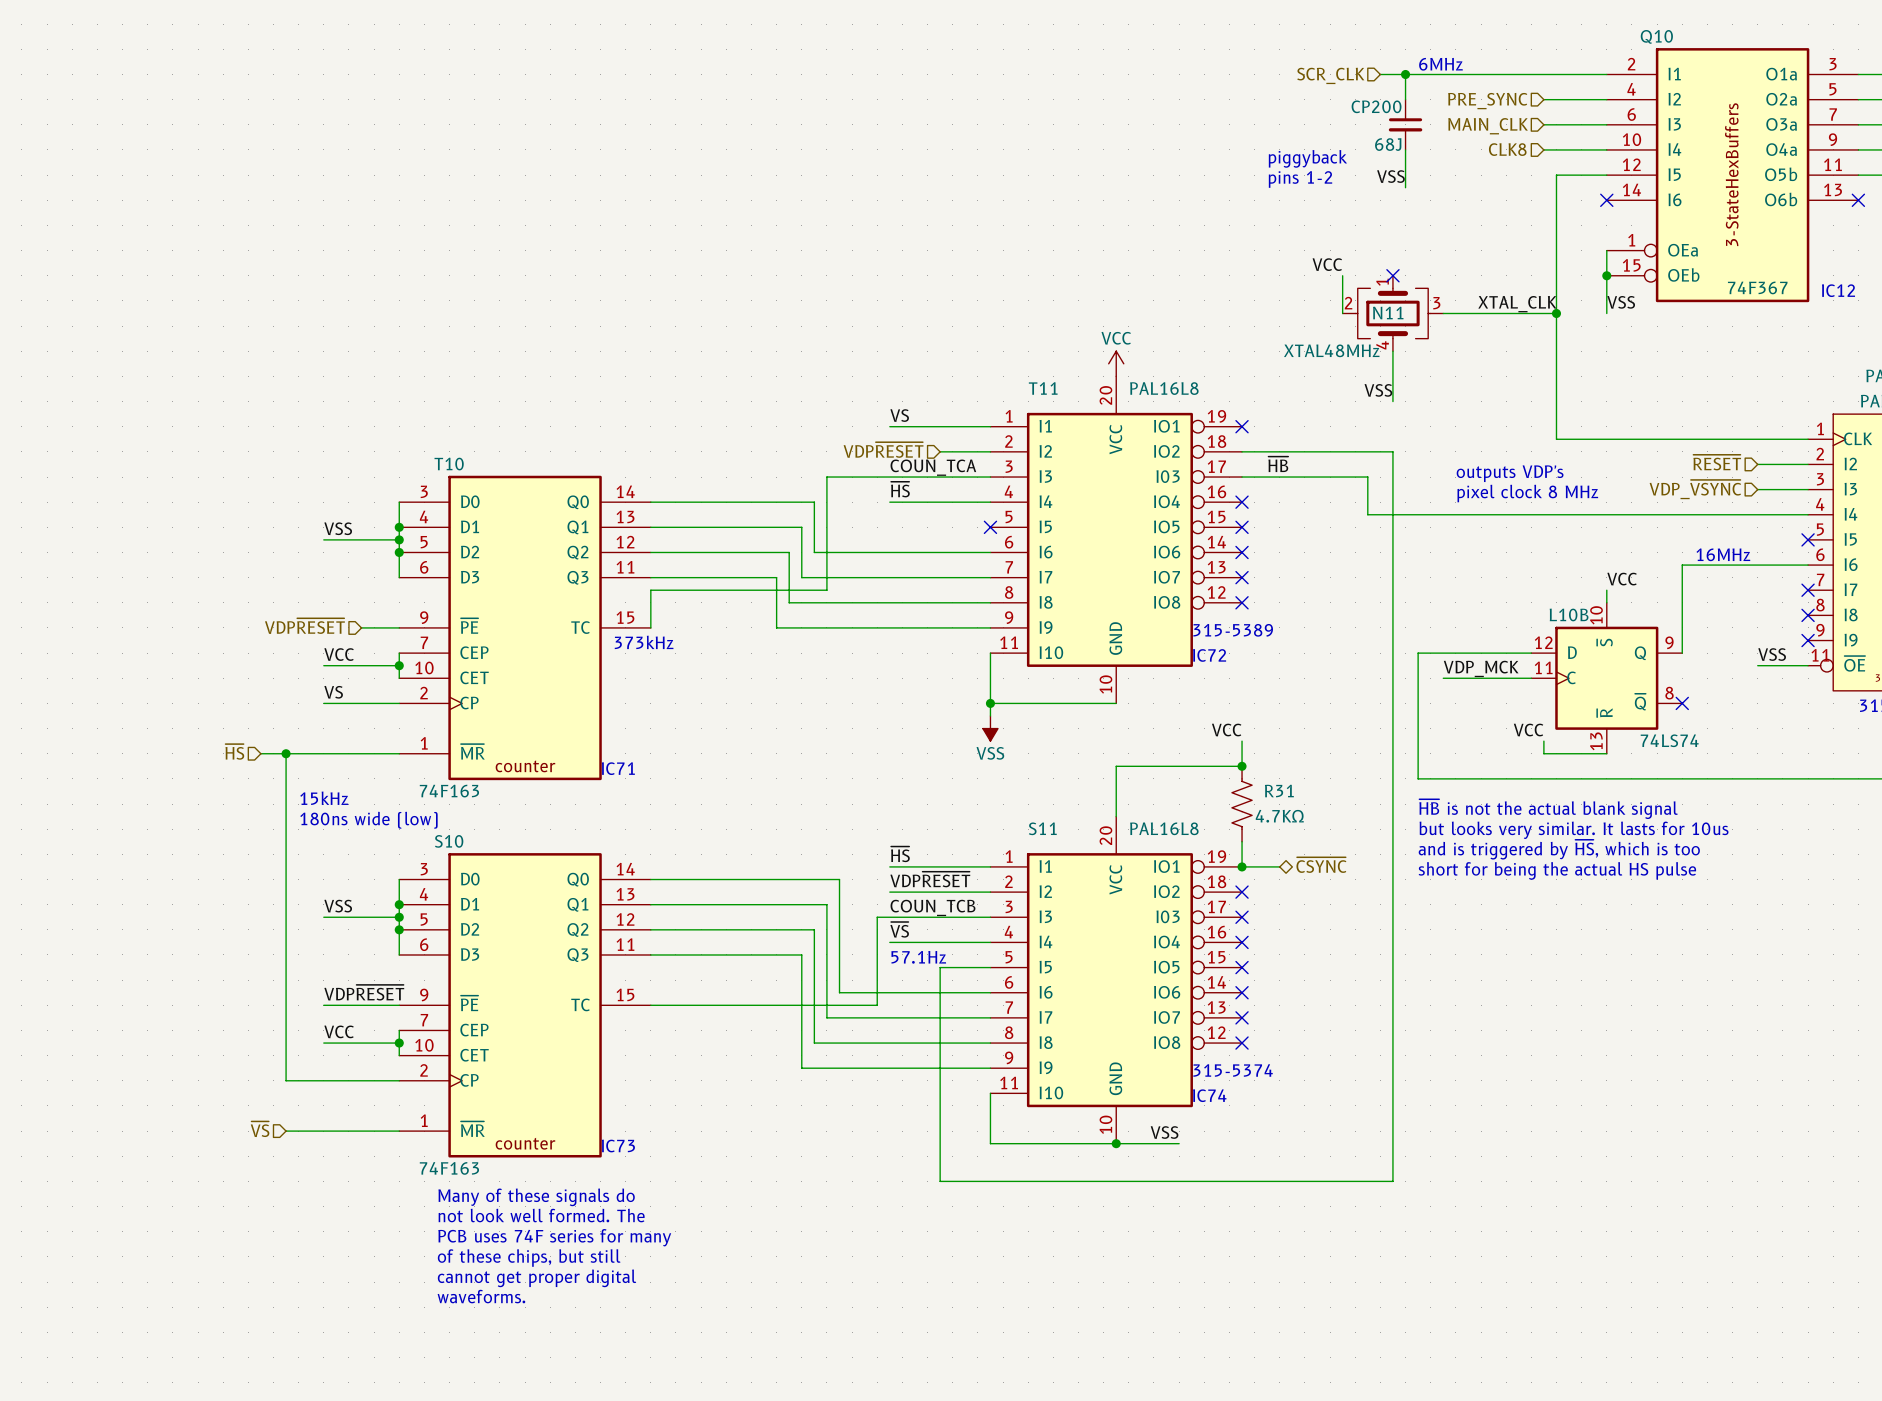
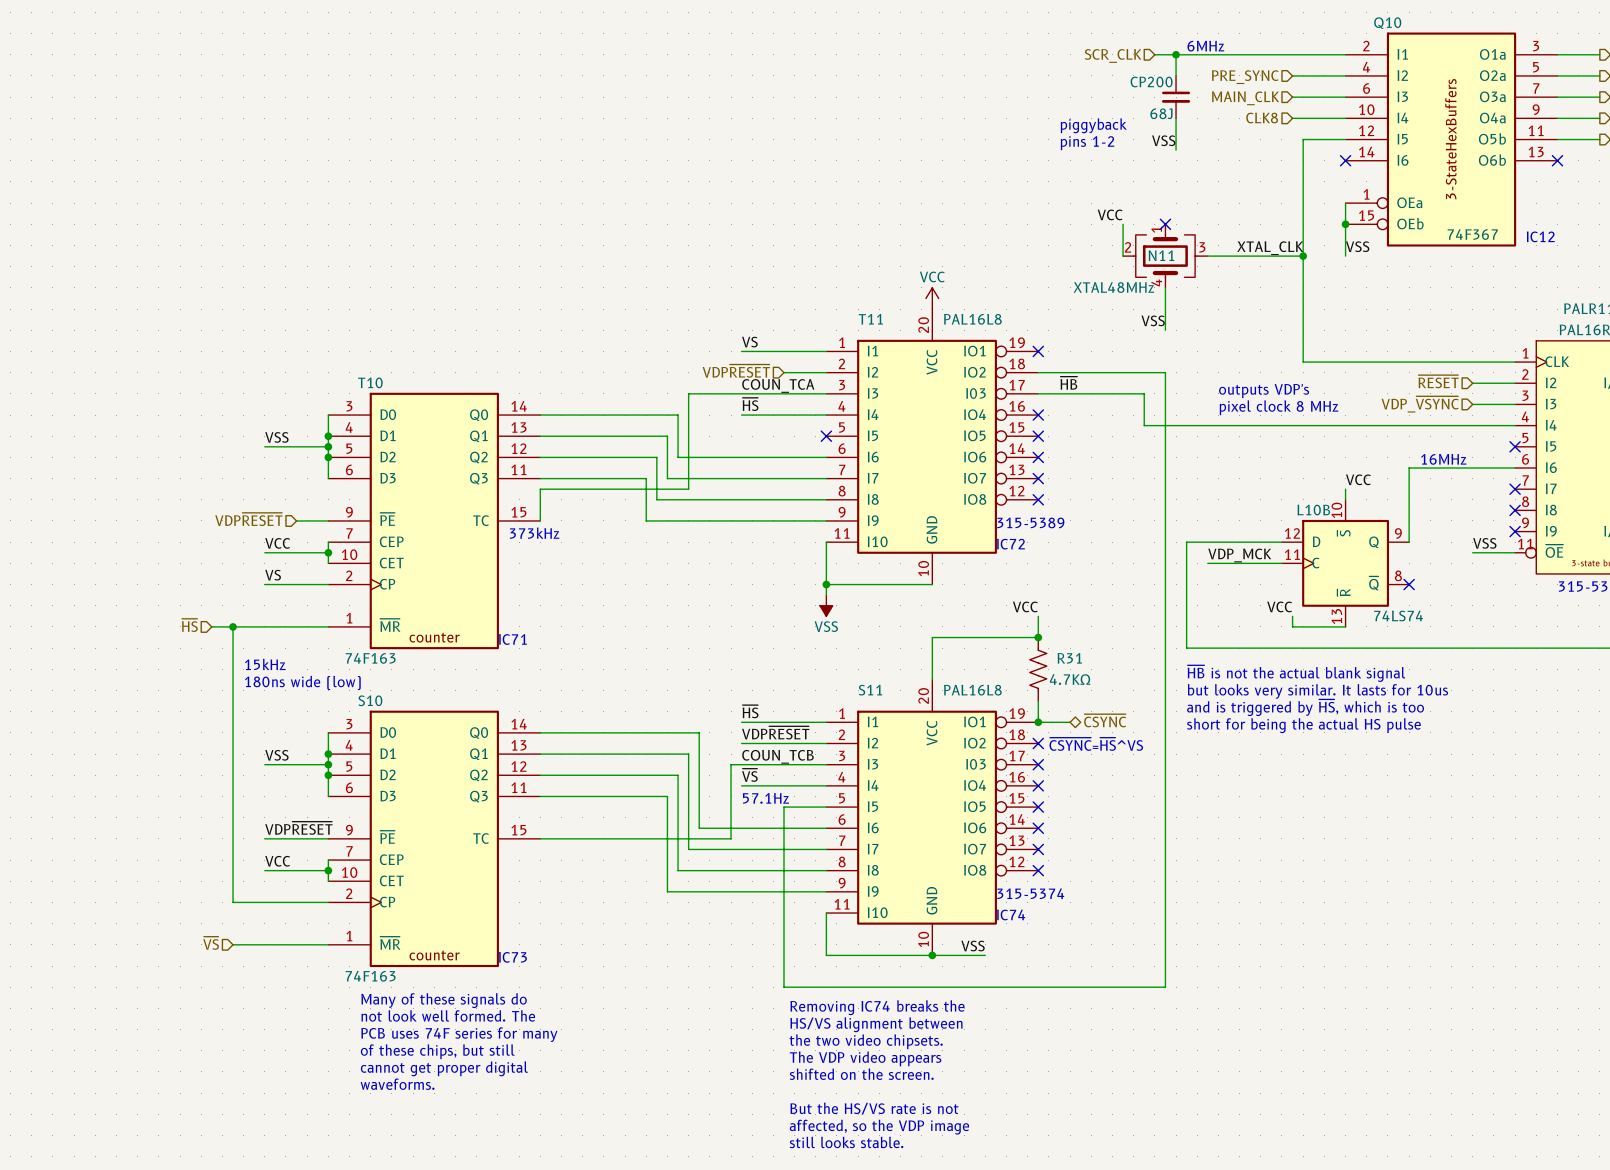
text: none -> ~{CSYNC}=~{HS}^VS (1096, 744)
text: none -> Removing IC74 breaks the (877, 1007)
text: none -> HS/VS alignment between (876, 1024)
text: none -> the two video chipsets. (866, 1041)
text: none -> The VDP video appears (865, 1058)
text: none -> shifted on the screen. (861, 1074)
text: none -> But the HS/VS rate is not (874, 1108)
text: none -> affected, so the VDP image (879, 1127)
text: none -> still looks stable. (846, 1142)

